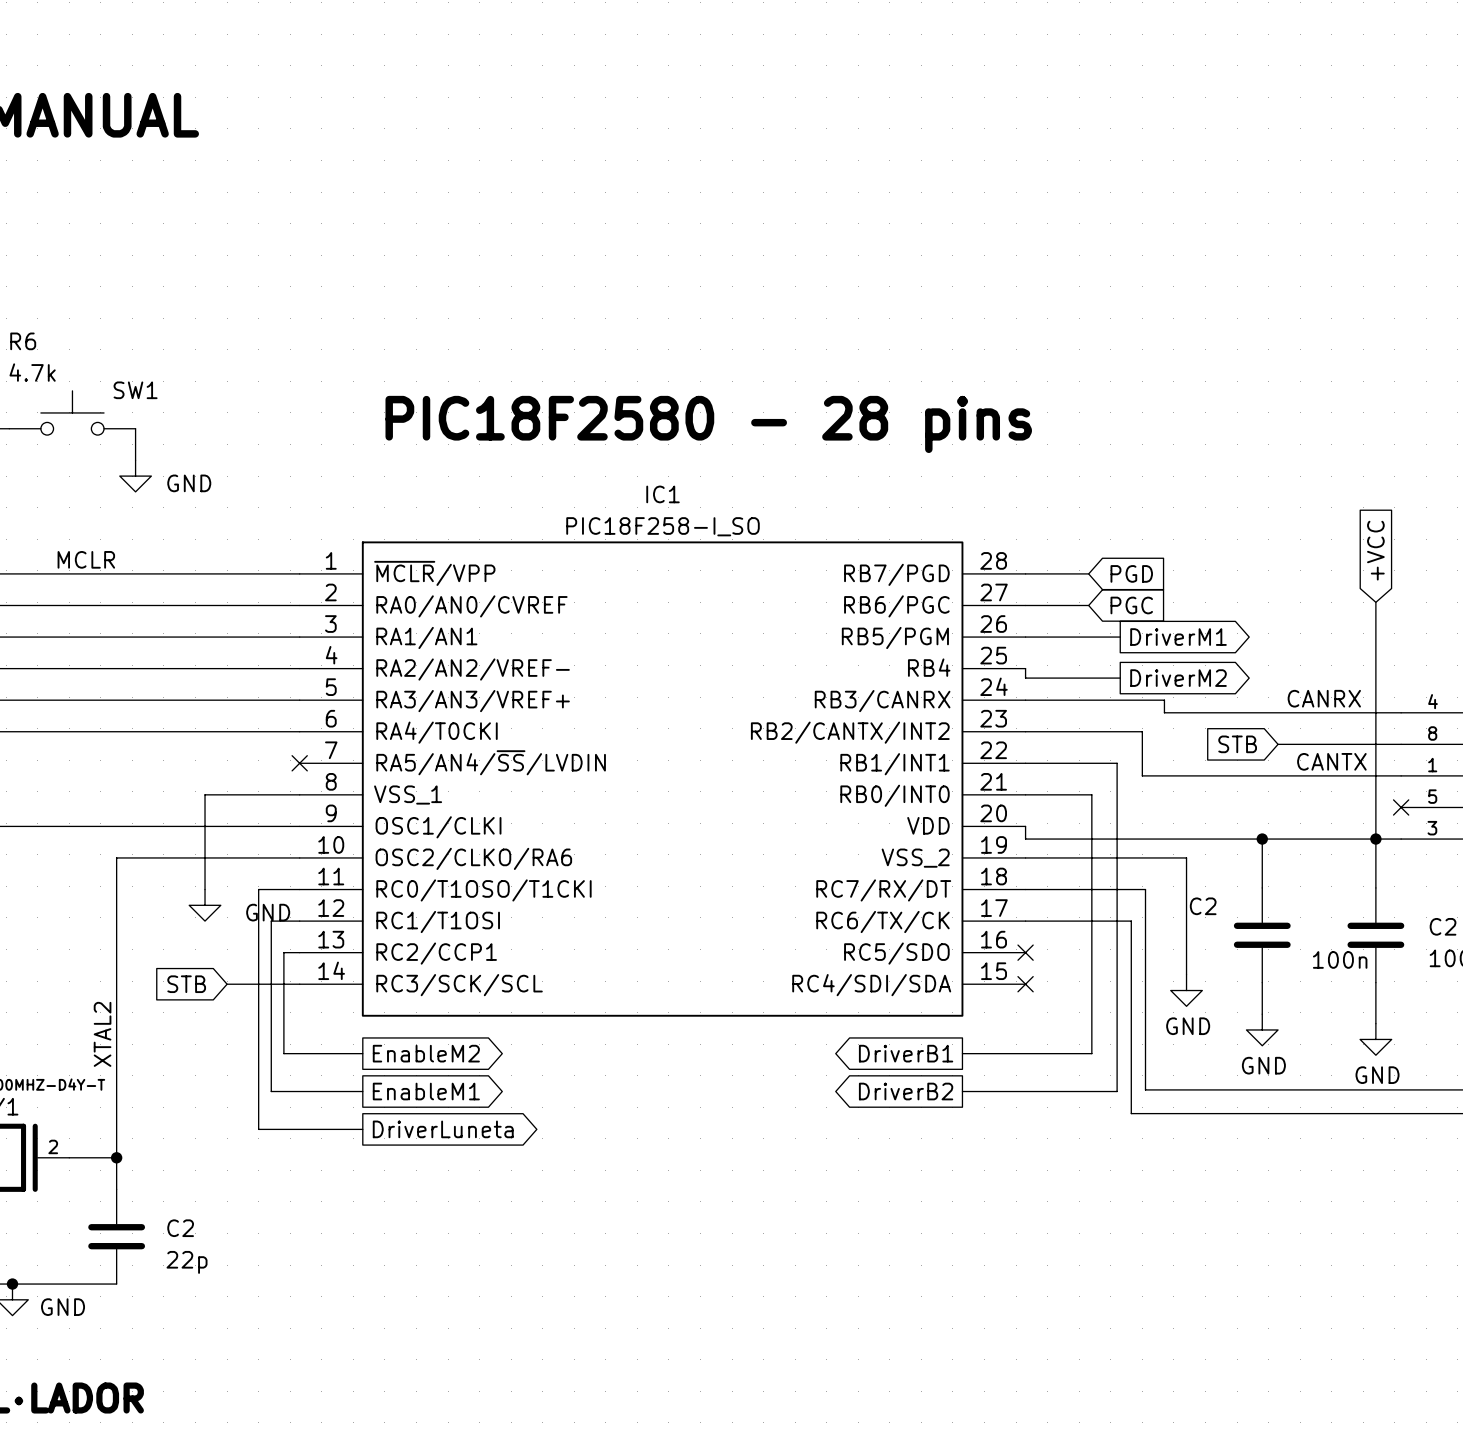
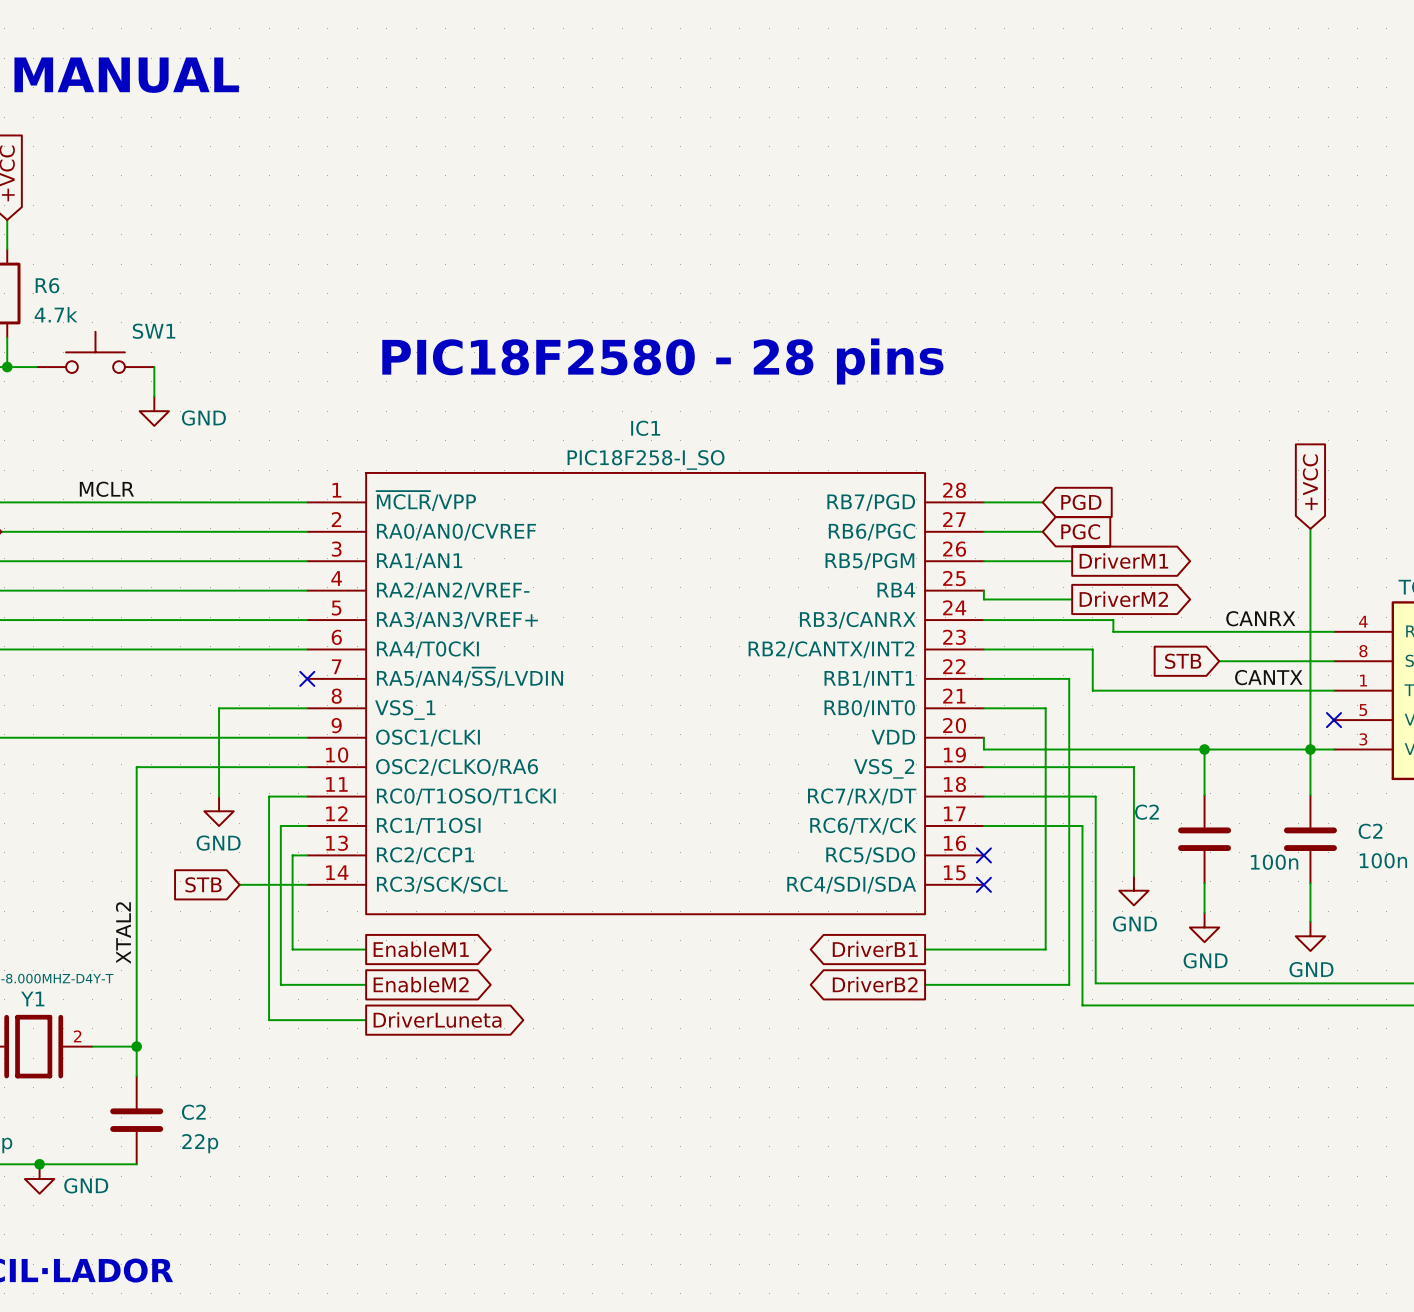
power symbol text position: GND (268, 912) -> GND (218, 843)
global label: EnableM2 (426, 1053) -> EnableM1 (421, 949)
global label: EnableM1 (426, 1091) -> EnableM2 (421, 984)

